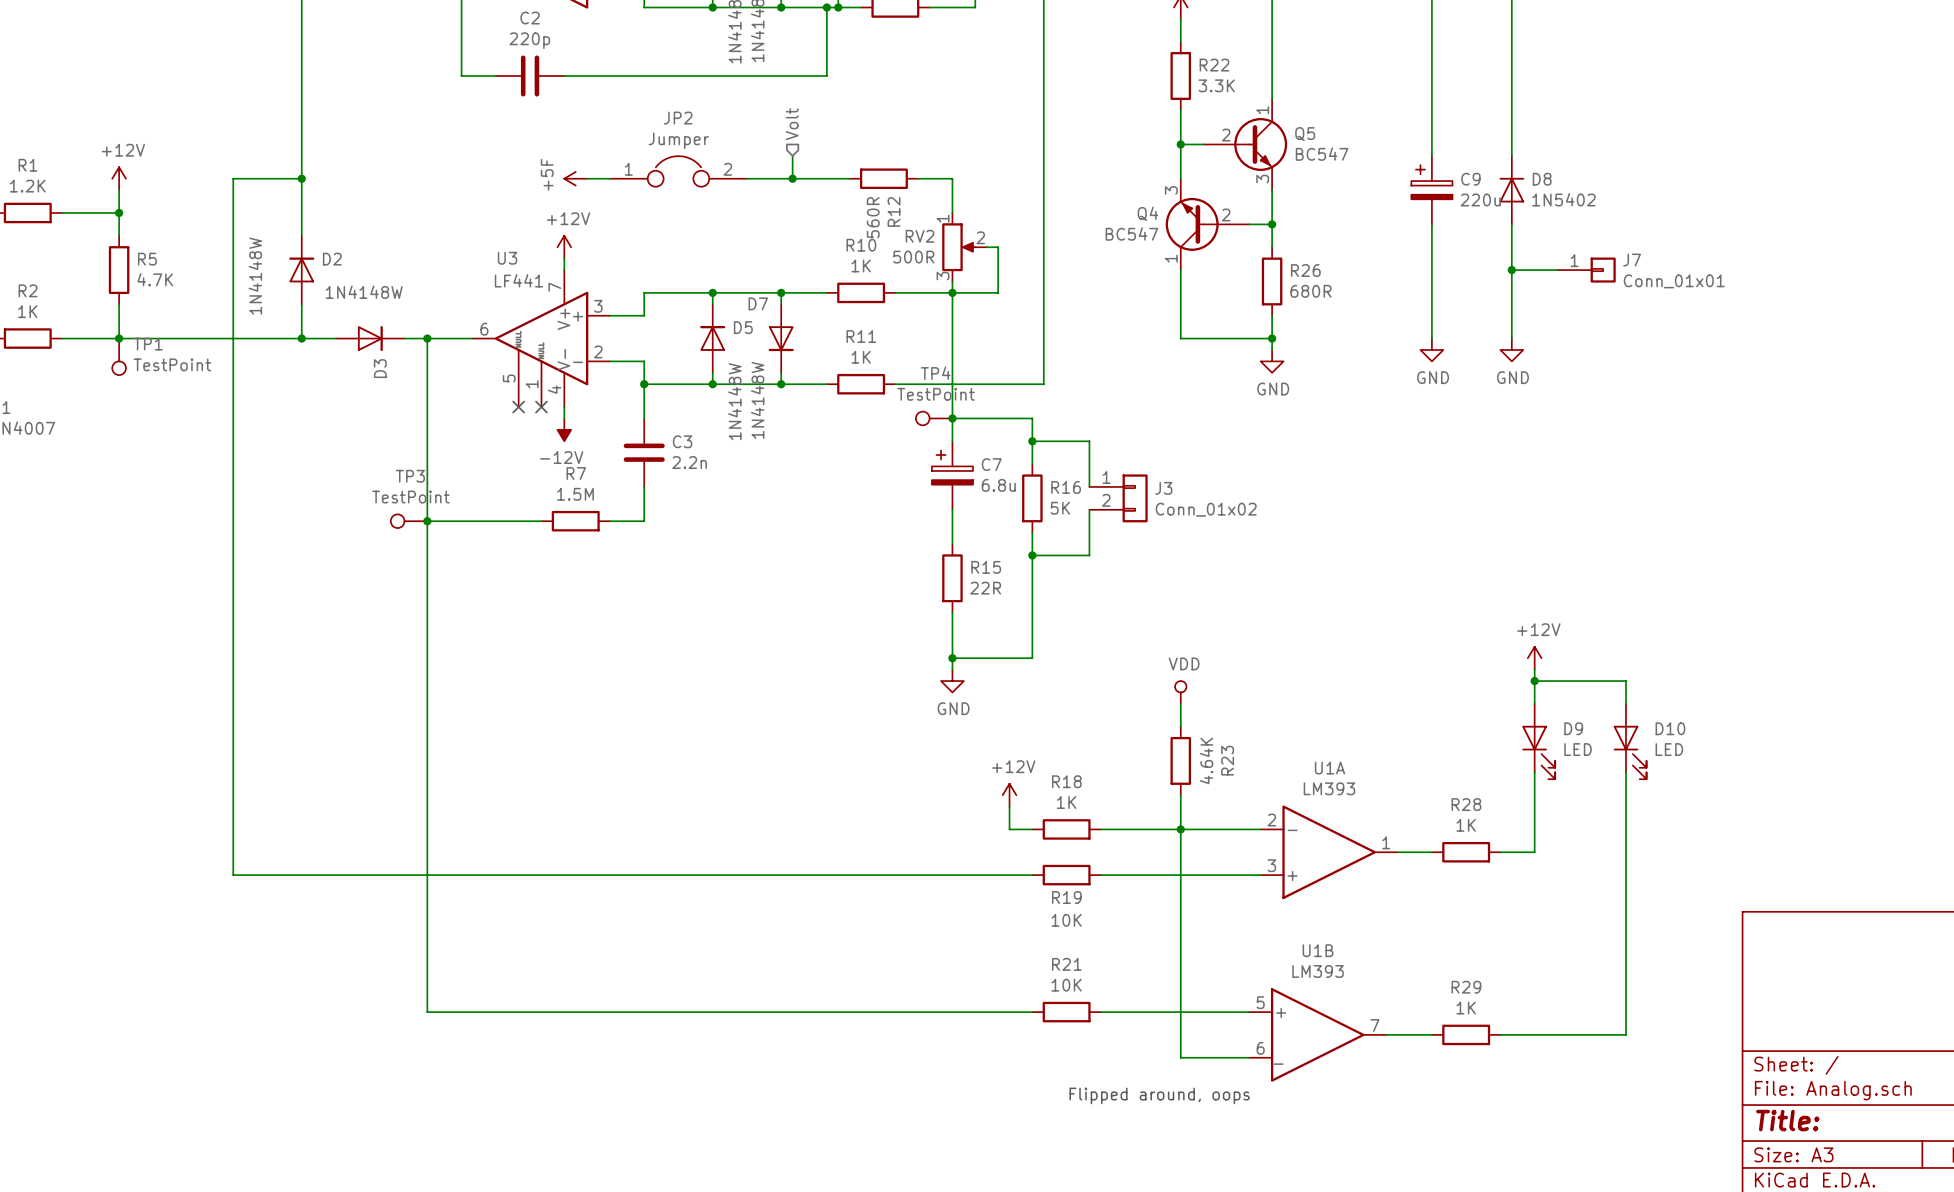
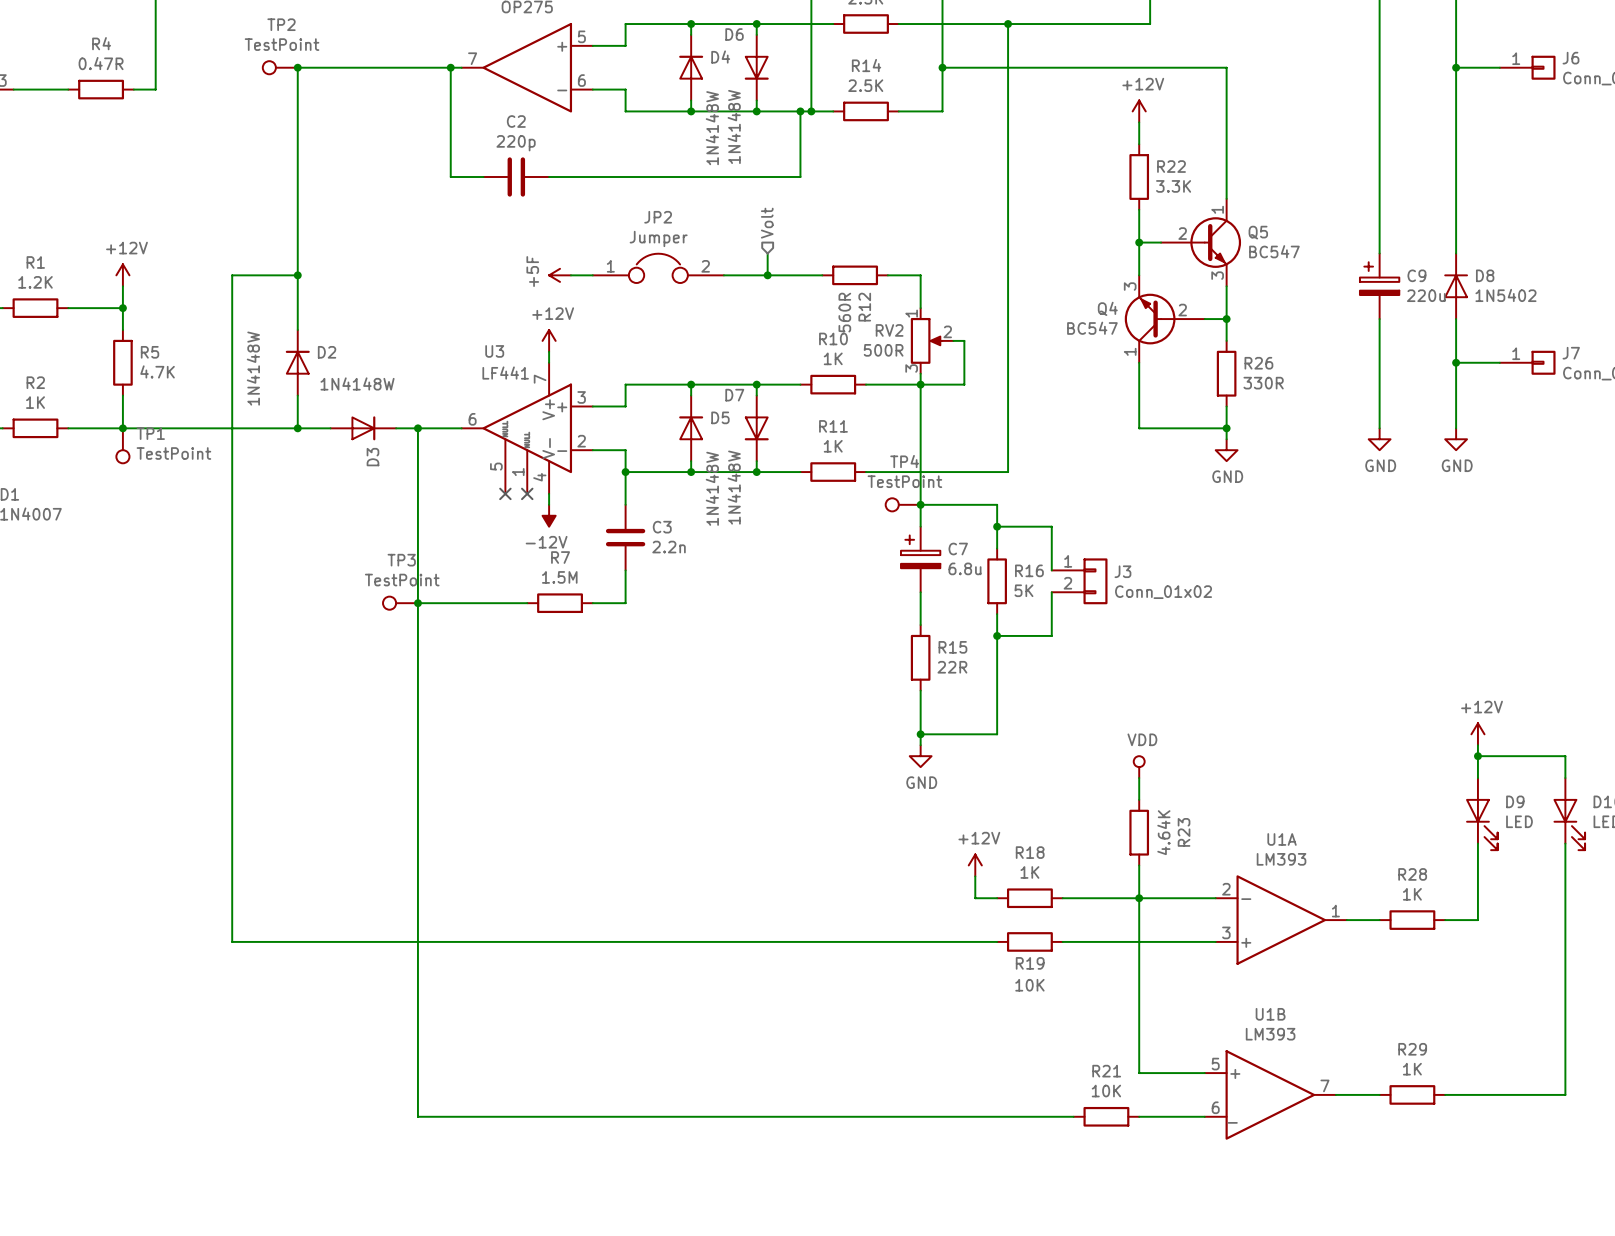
R26 value: 680R (1310, 291) -> 330R (1263, 383)
wire: (427, 1012) (1032, 1012) -> (417, 1073) (417, 1116) (1073, 1116)
R21 position: (1066, 1012) -> (1106, 1116)
wire: (1100, 1012) (1180, 1012) (1180, 1057) -> none
text: Flipped around, oops (1159, 1095) -> none

